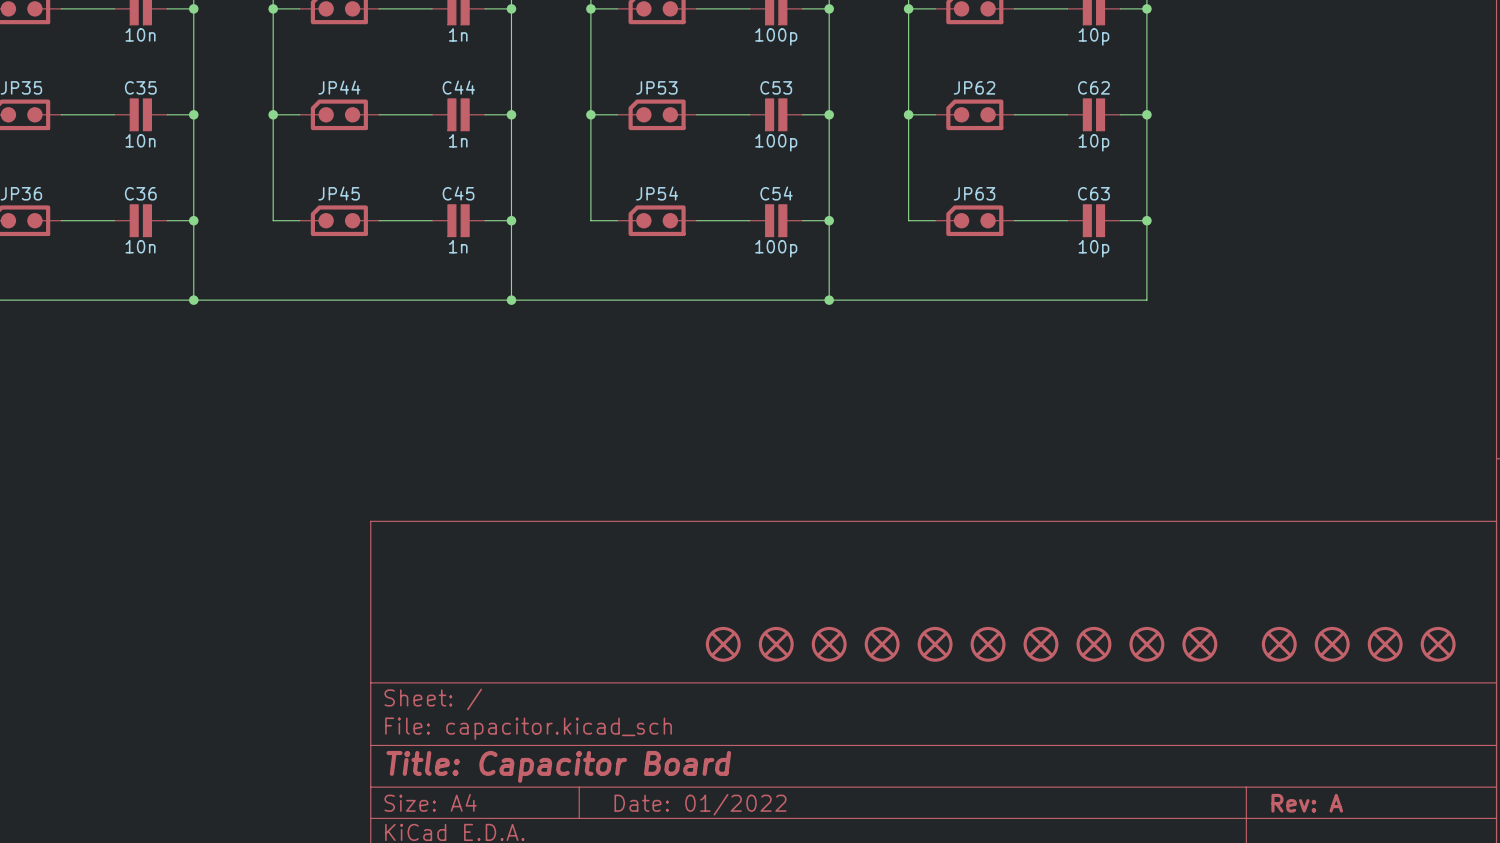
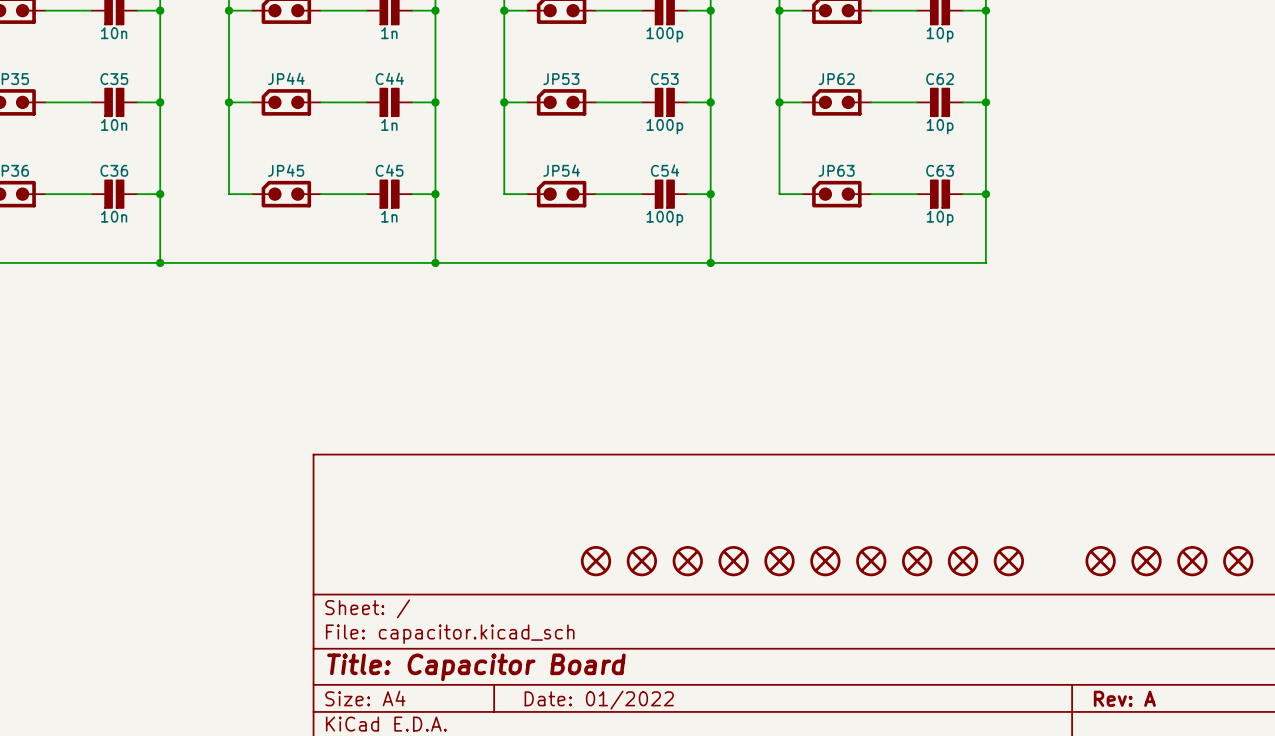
part: none -> (596, 561)
part: (723, 644) -> none
part: none -> (641, 561)
part: (776, 644) -> none
part: none -> (687, 561)
part: (829, 644) -> none
part: none -> (733, 561)
part: (882, 644) -> none
part: none -> (779, 561)
part: (935, 644) -> none
part: none -> (825, 561)
part: (988, 644) -> none
part: none -> (871, 561)
part: (1041, 644) -> none
part: none -> (917, 561)
part: (1093, 644) -> none
part: none -> (963, 561)
part: (1146, 644) -> none
part: none -> (1008, 561)
part: (1199, 644) -> none

